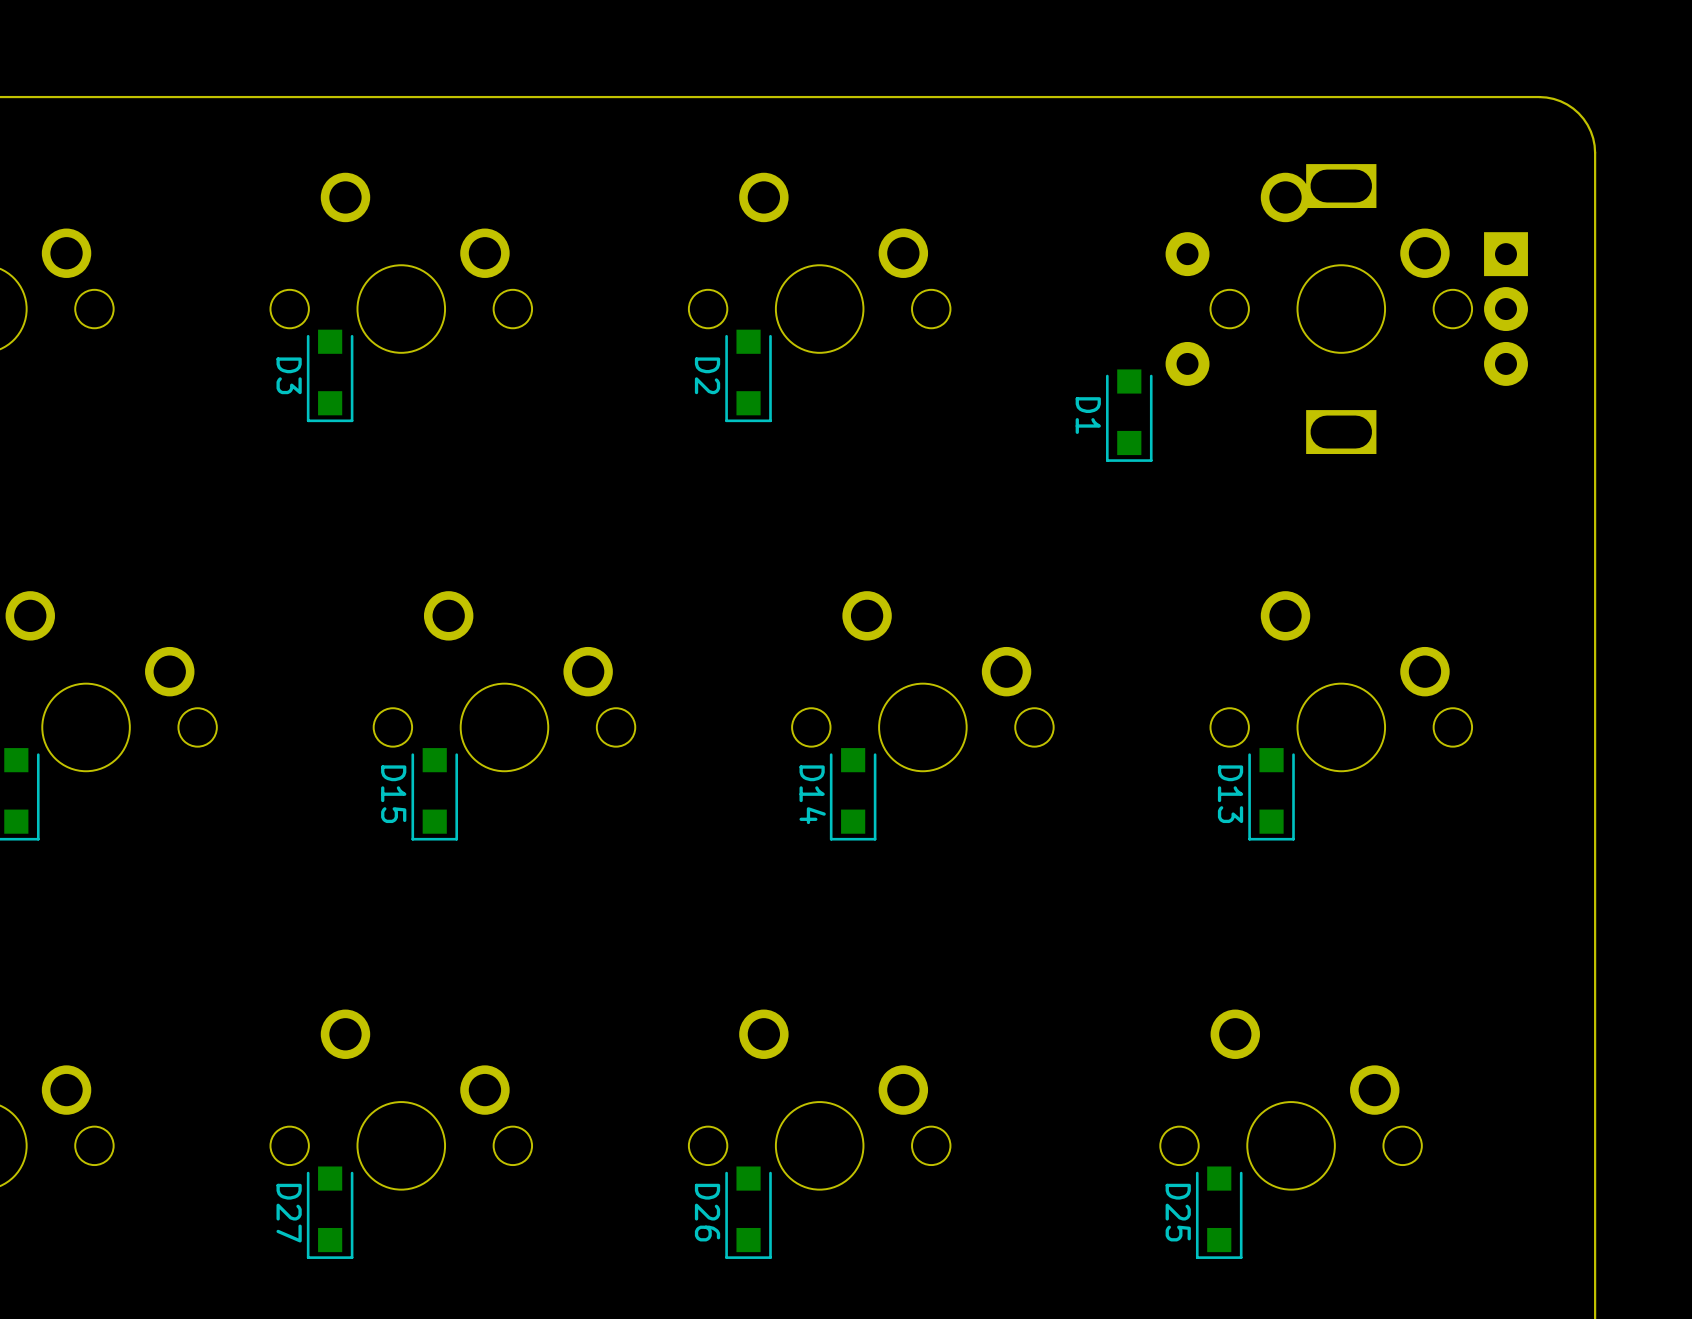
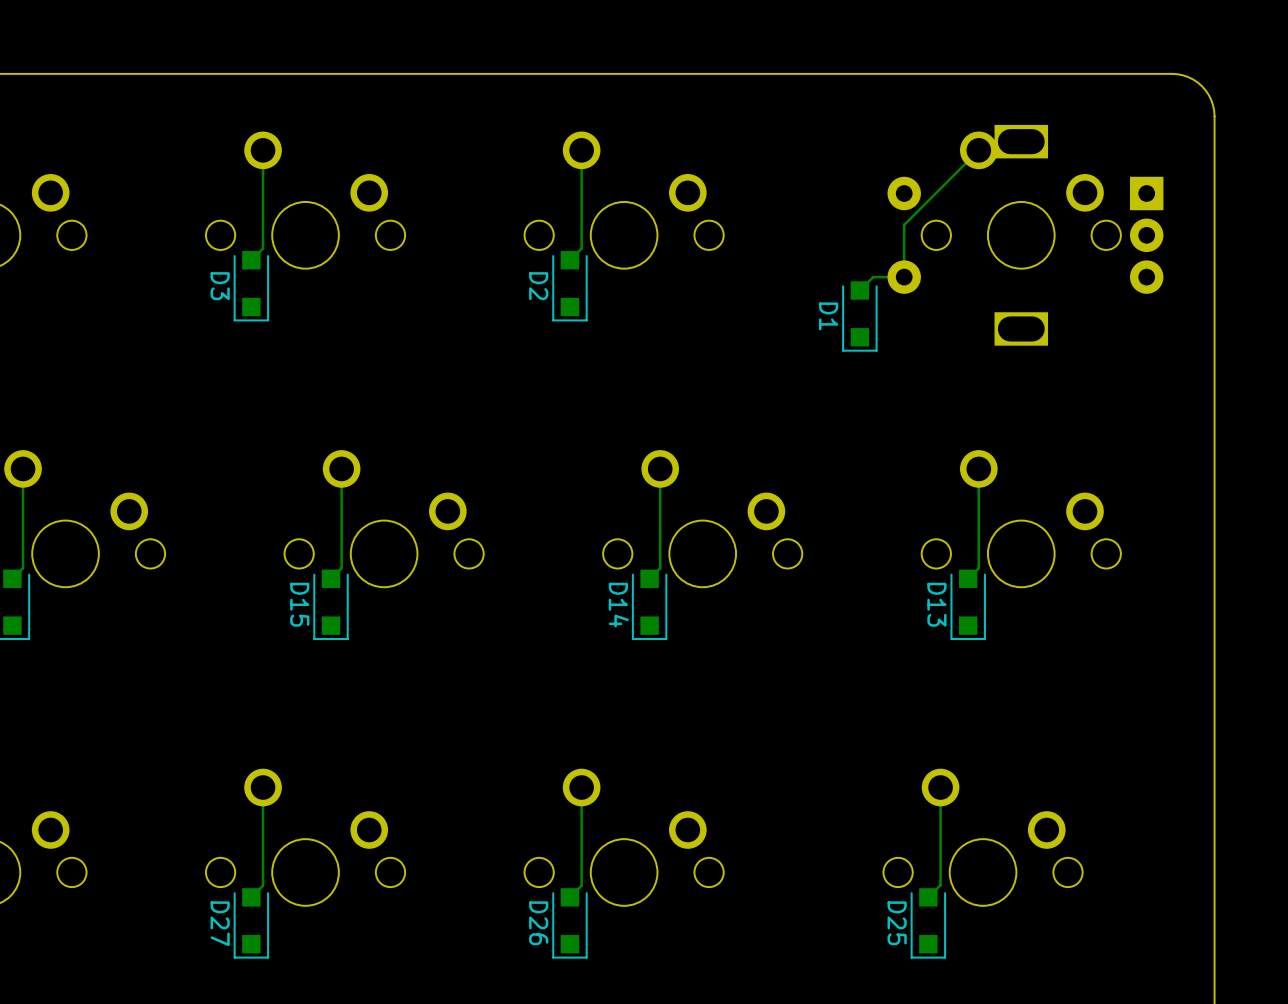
track: none -> (263, 150) (263, 248) (251, 260)
track: none -> (581, 150) (581, 248) (569, 260)
track: none -> (978, 150) (904, 224) (904, 277) (873, 277) (859, 290)
track: none -> (23, 468) (23, 568) (12, 578)
track: none -> (341, 468) (341, 568) (331, 578)
track: none -> (660, 468) (660, 568) (649, 578)
track: none -> (978, 468) (978, 568) (968, 578)
track: none -> (263, 787) (263, 885) (251, 897)
track: none -> (581, 787) (581, 885) (569, 897)
track: none -> (940, 787) (940, 885) (928, 897)

